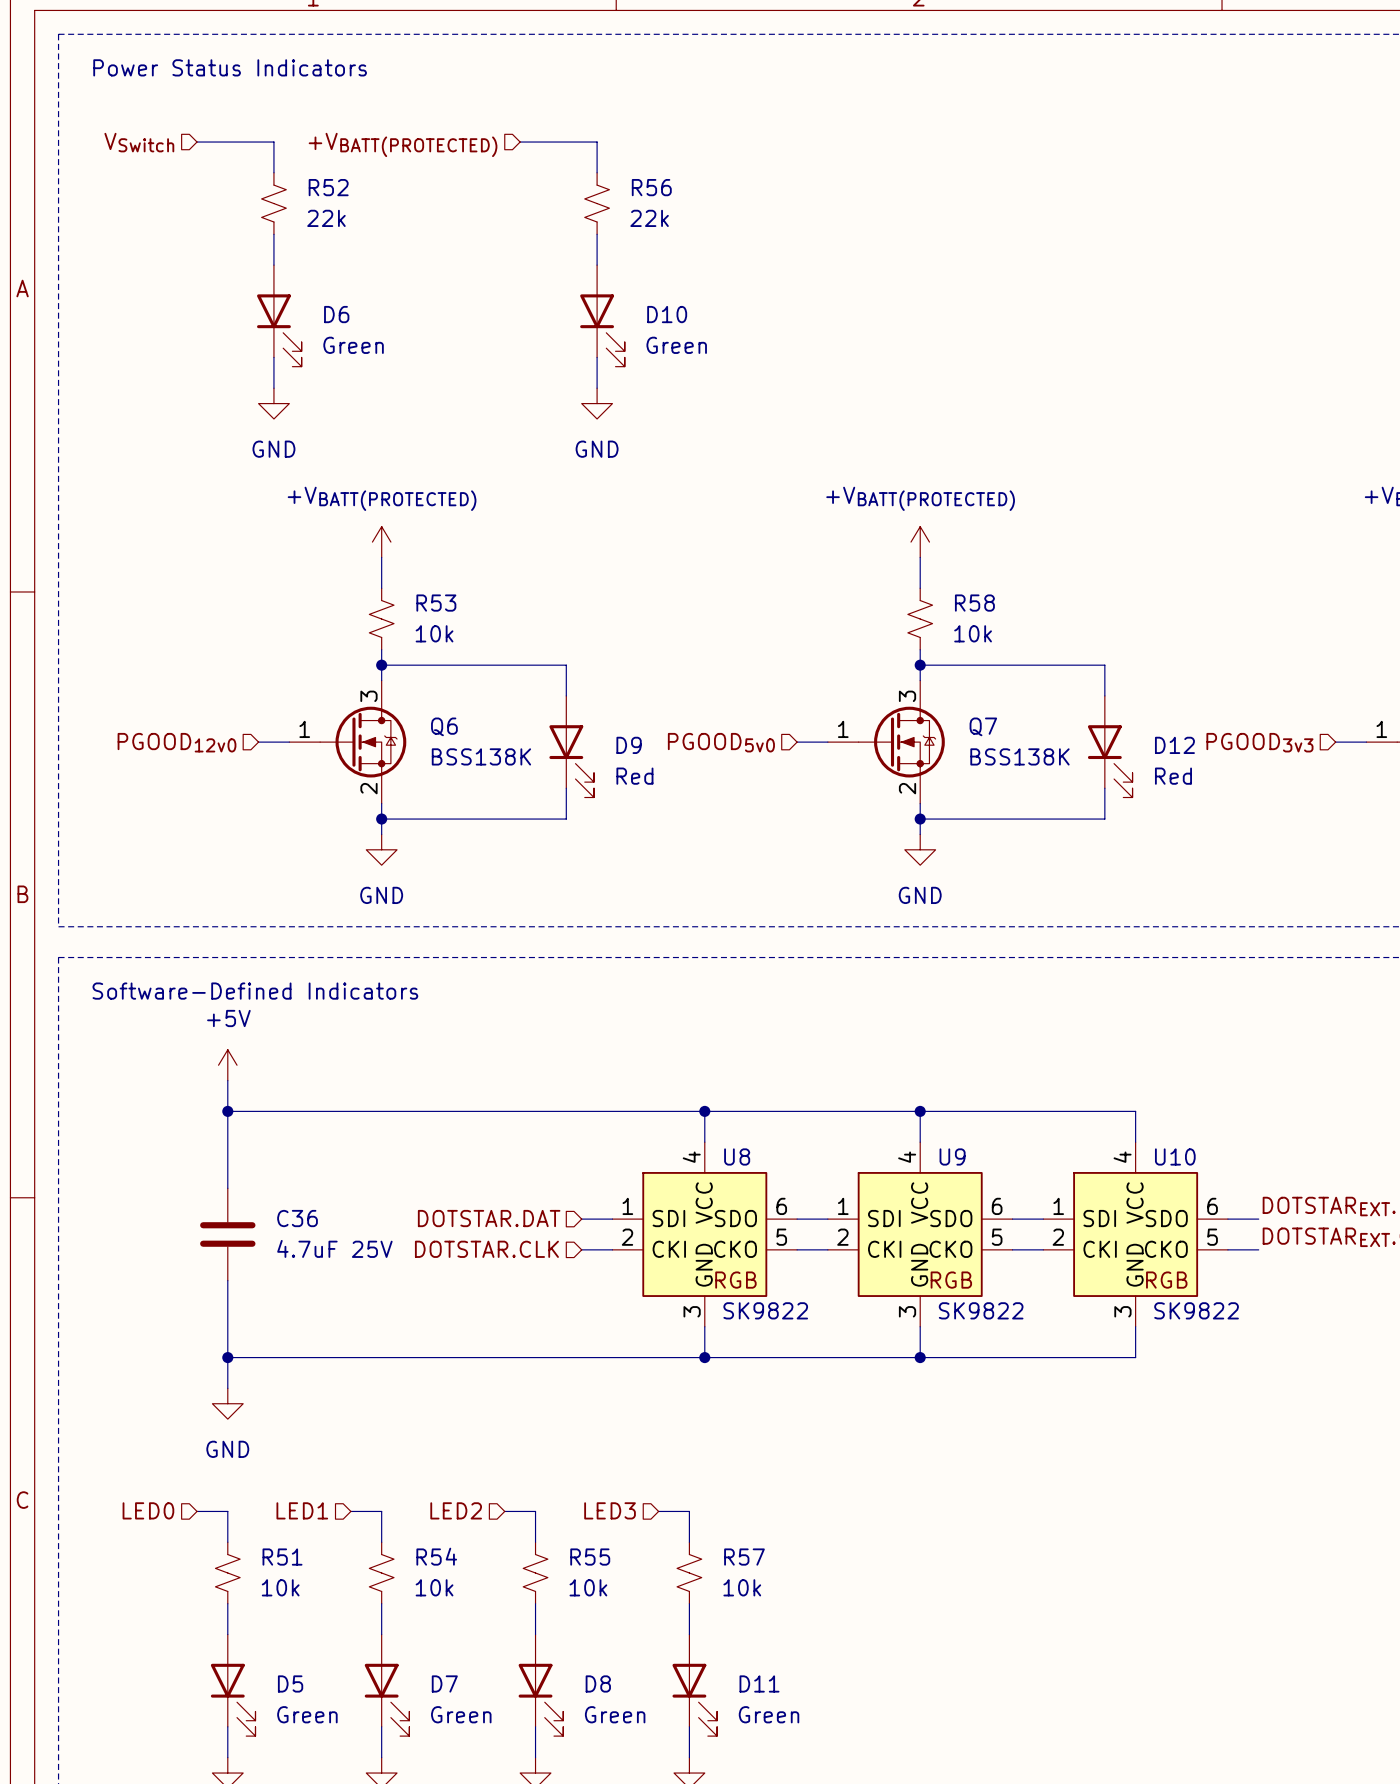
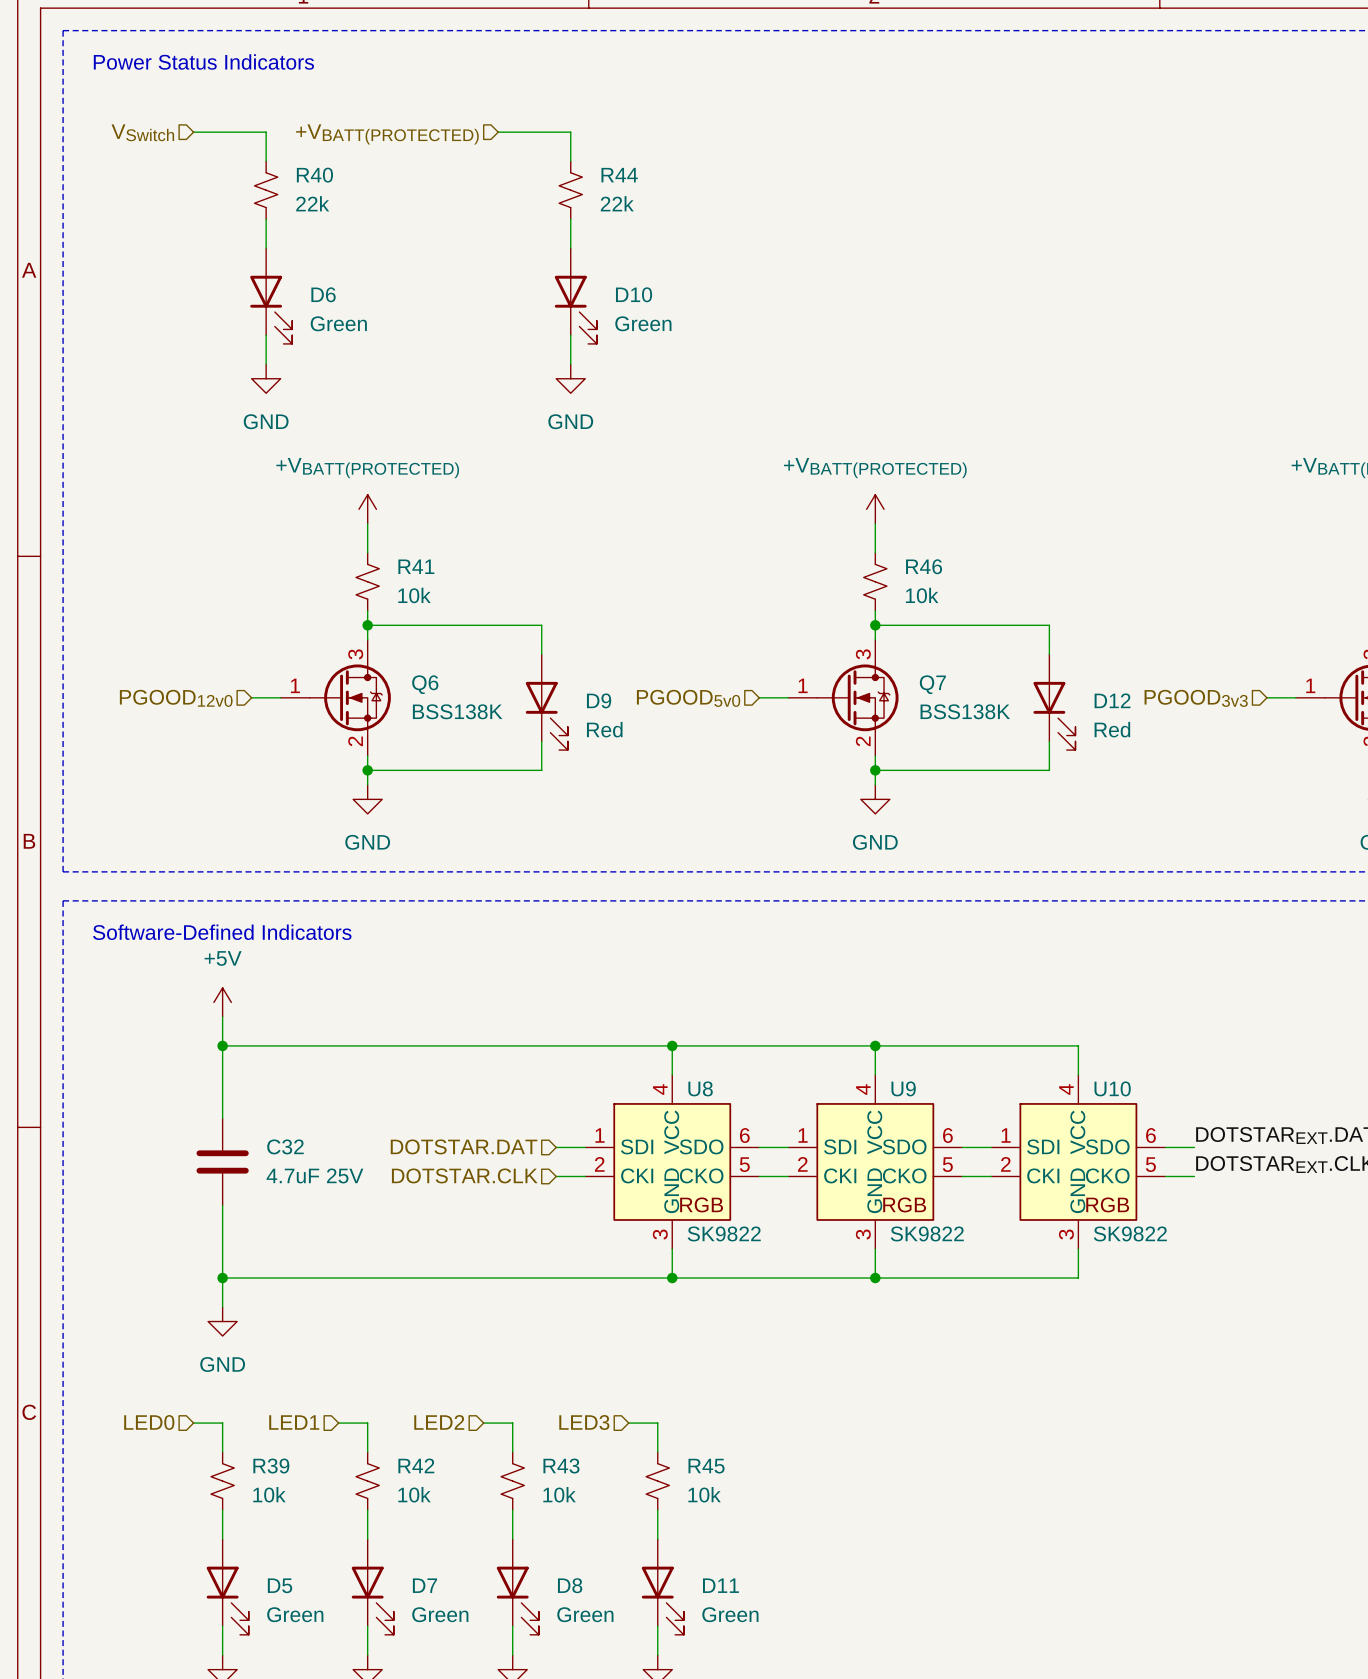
R52 name: R52 (328, 187) -> R40 (314, 175)
R56 name: R56 (651, 187) -> R44 (619, 175)
R53 name: R53 (436, 603) -> R41 (416, 566)
R58 name: R58 (974, 603) -> R46 (924, 566)
C36 name: C36 (297, 1218) -> C32 (285, 1146)
R54 name: R54 (436, 1556) -> R42 (416, 1465)
R51 name: R51 (282, 1557) -> R39 (271, 1466)
R55 name: R55 (590, 1557) -> R43 (561, 1466)
R57 name: R57 (744, 1557) -> R45 (706, 1466)

